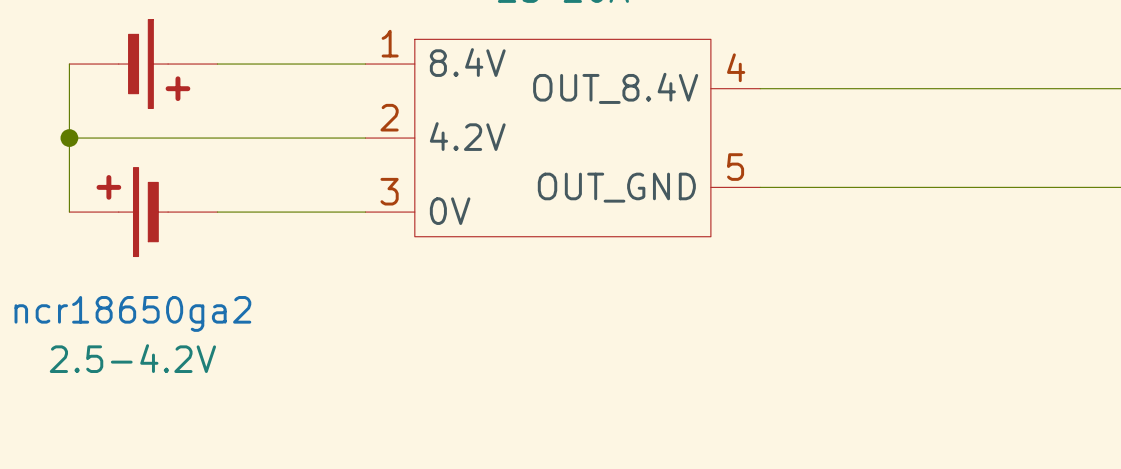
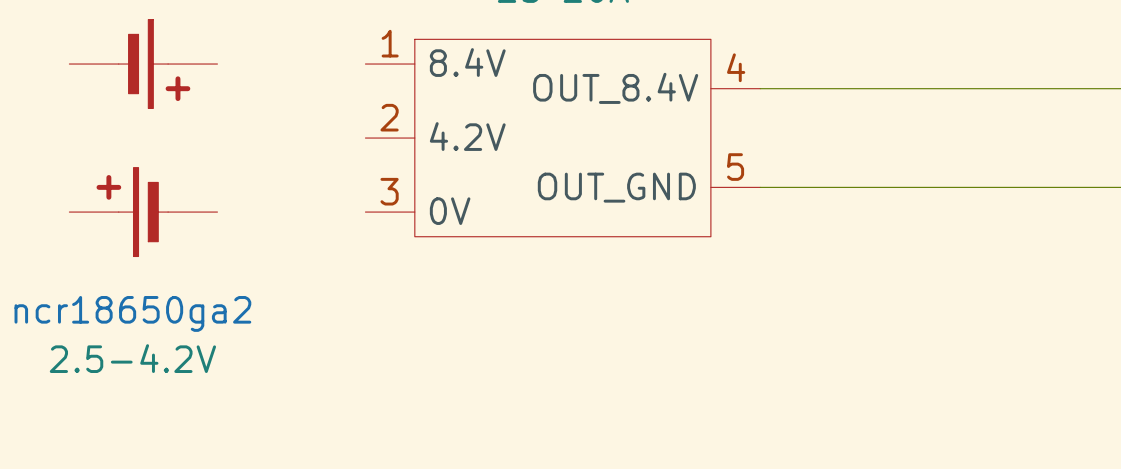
wire: (69, 64) (69, 212) -> none
wire: (217, 64) (365, 64) -> none
wire: (69, 138) (365, 138) -> none
junction: (69, 138) -> none
wire: (217, 212) (365, 212) -> none

